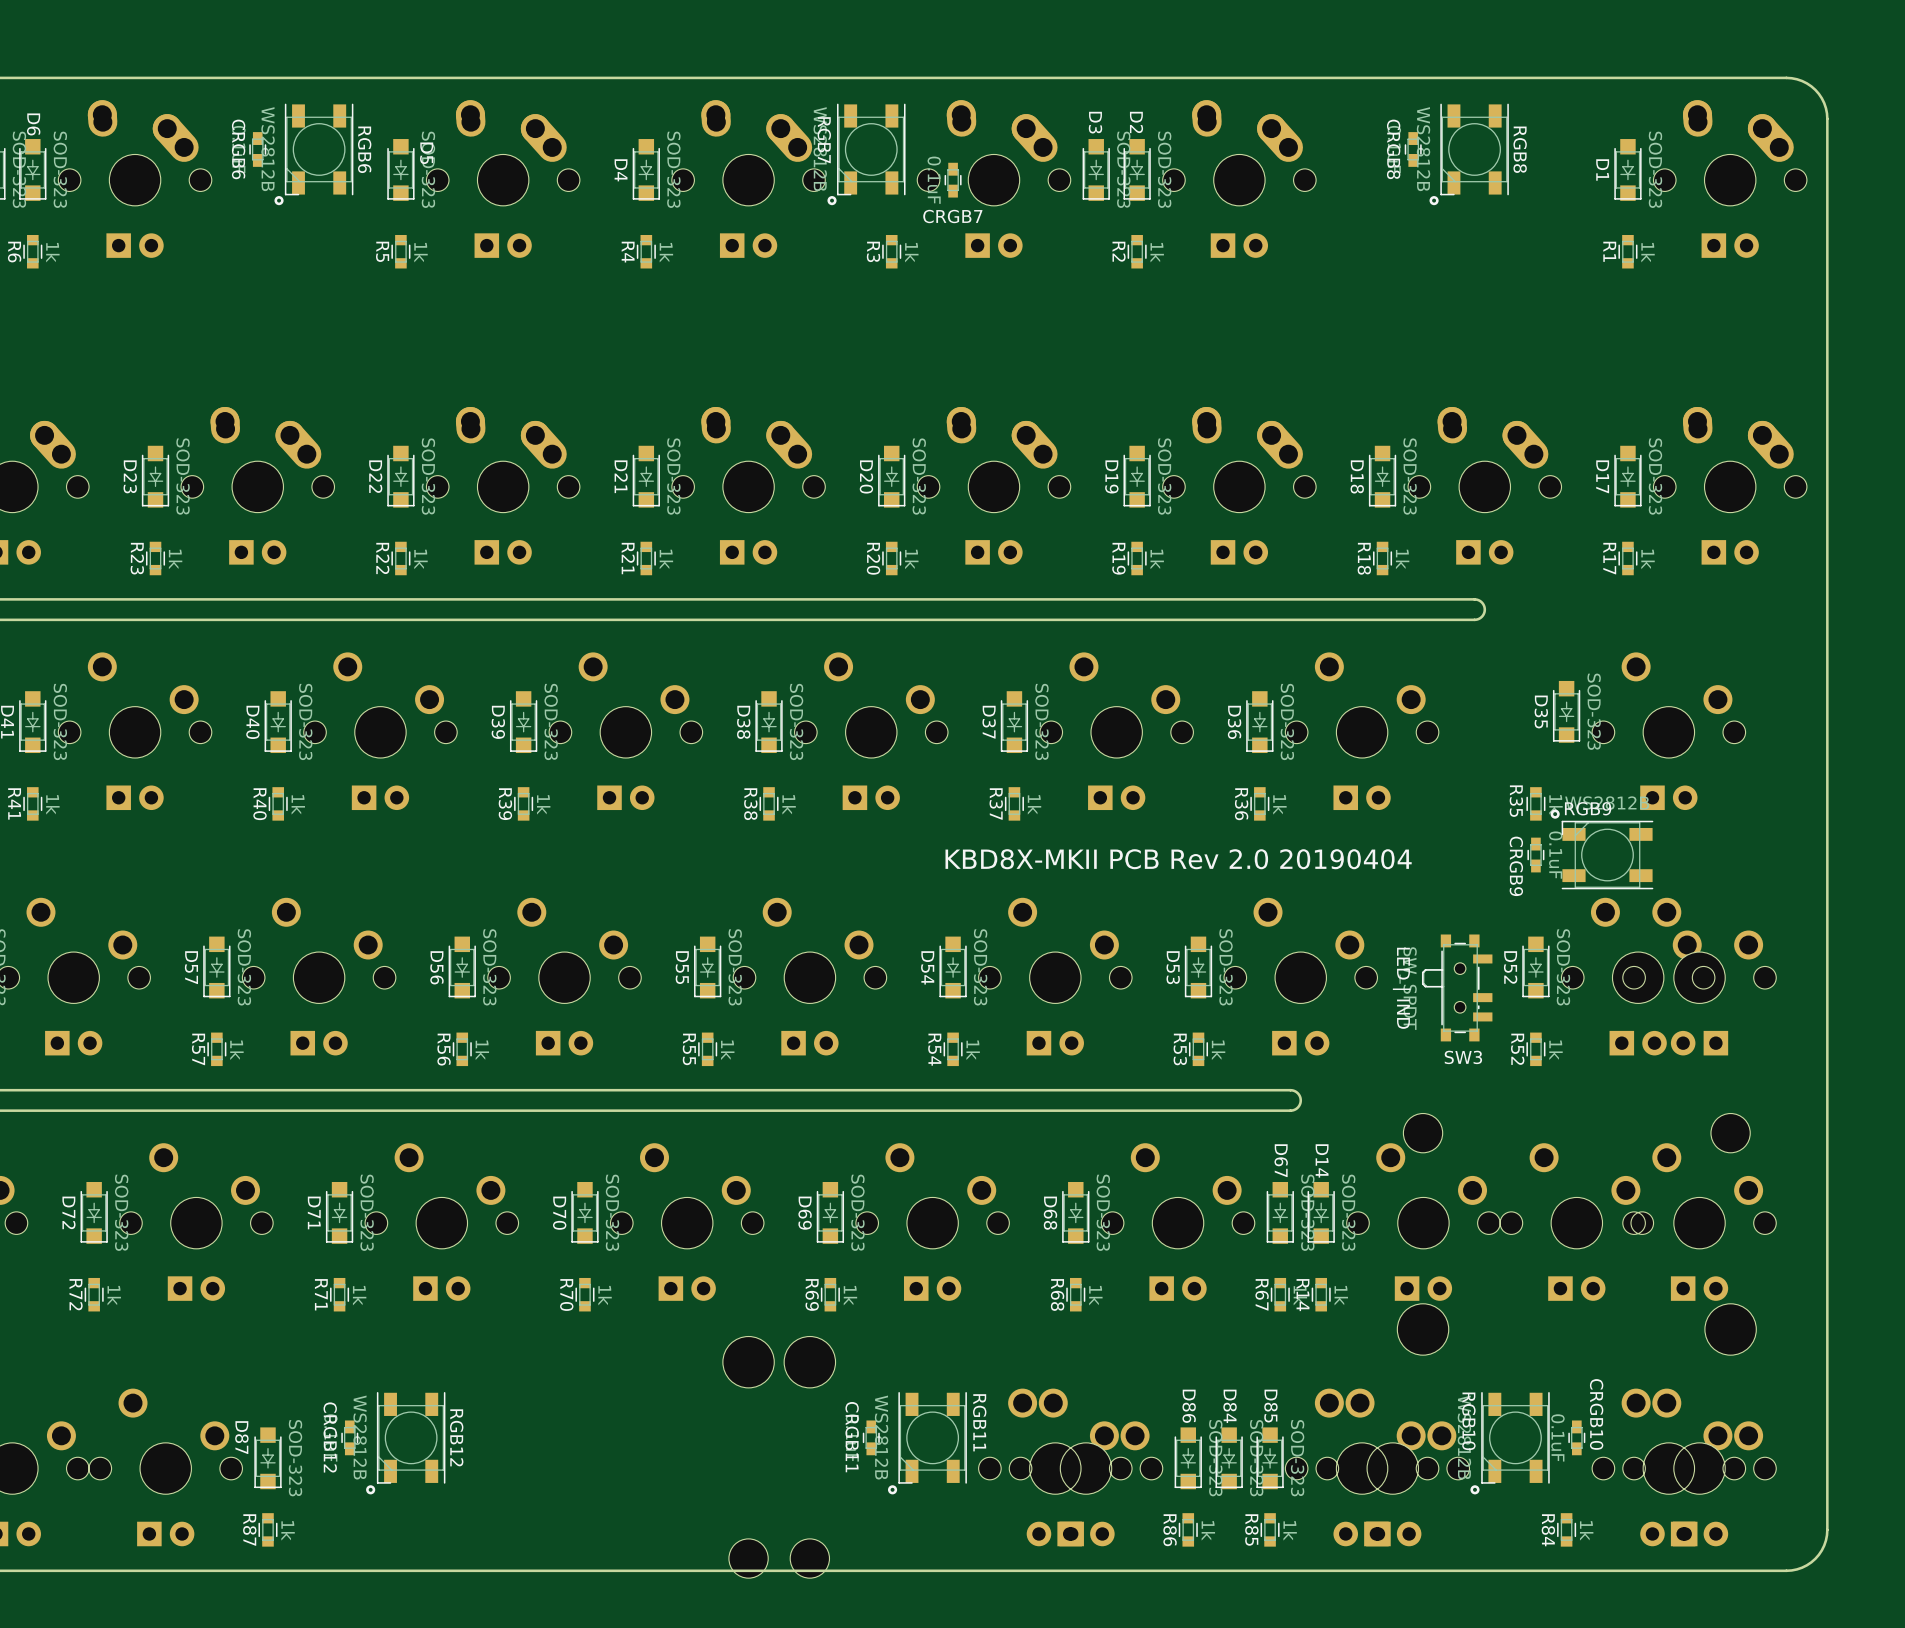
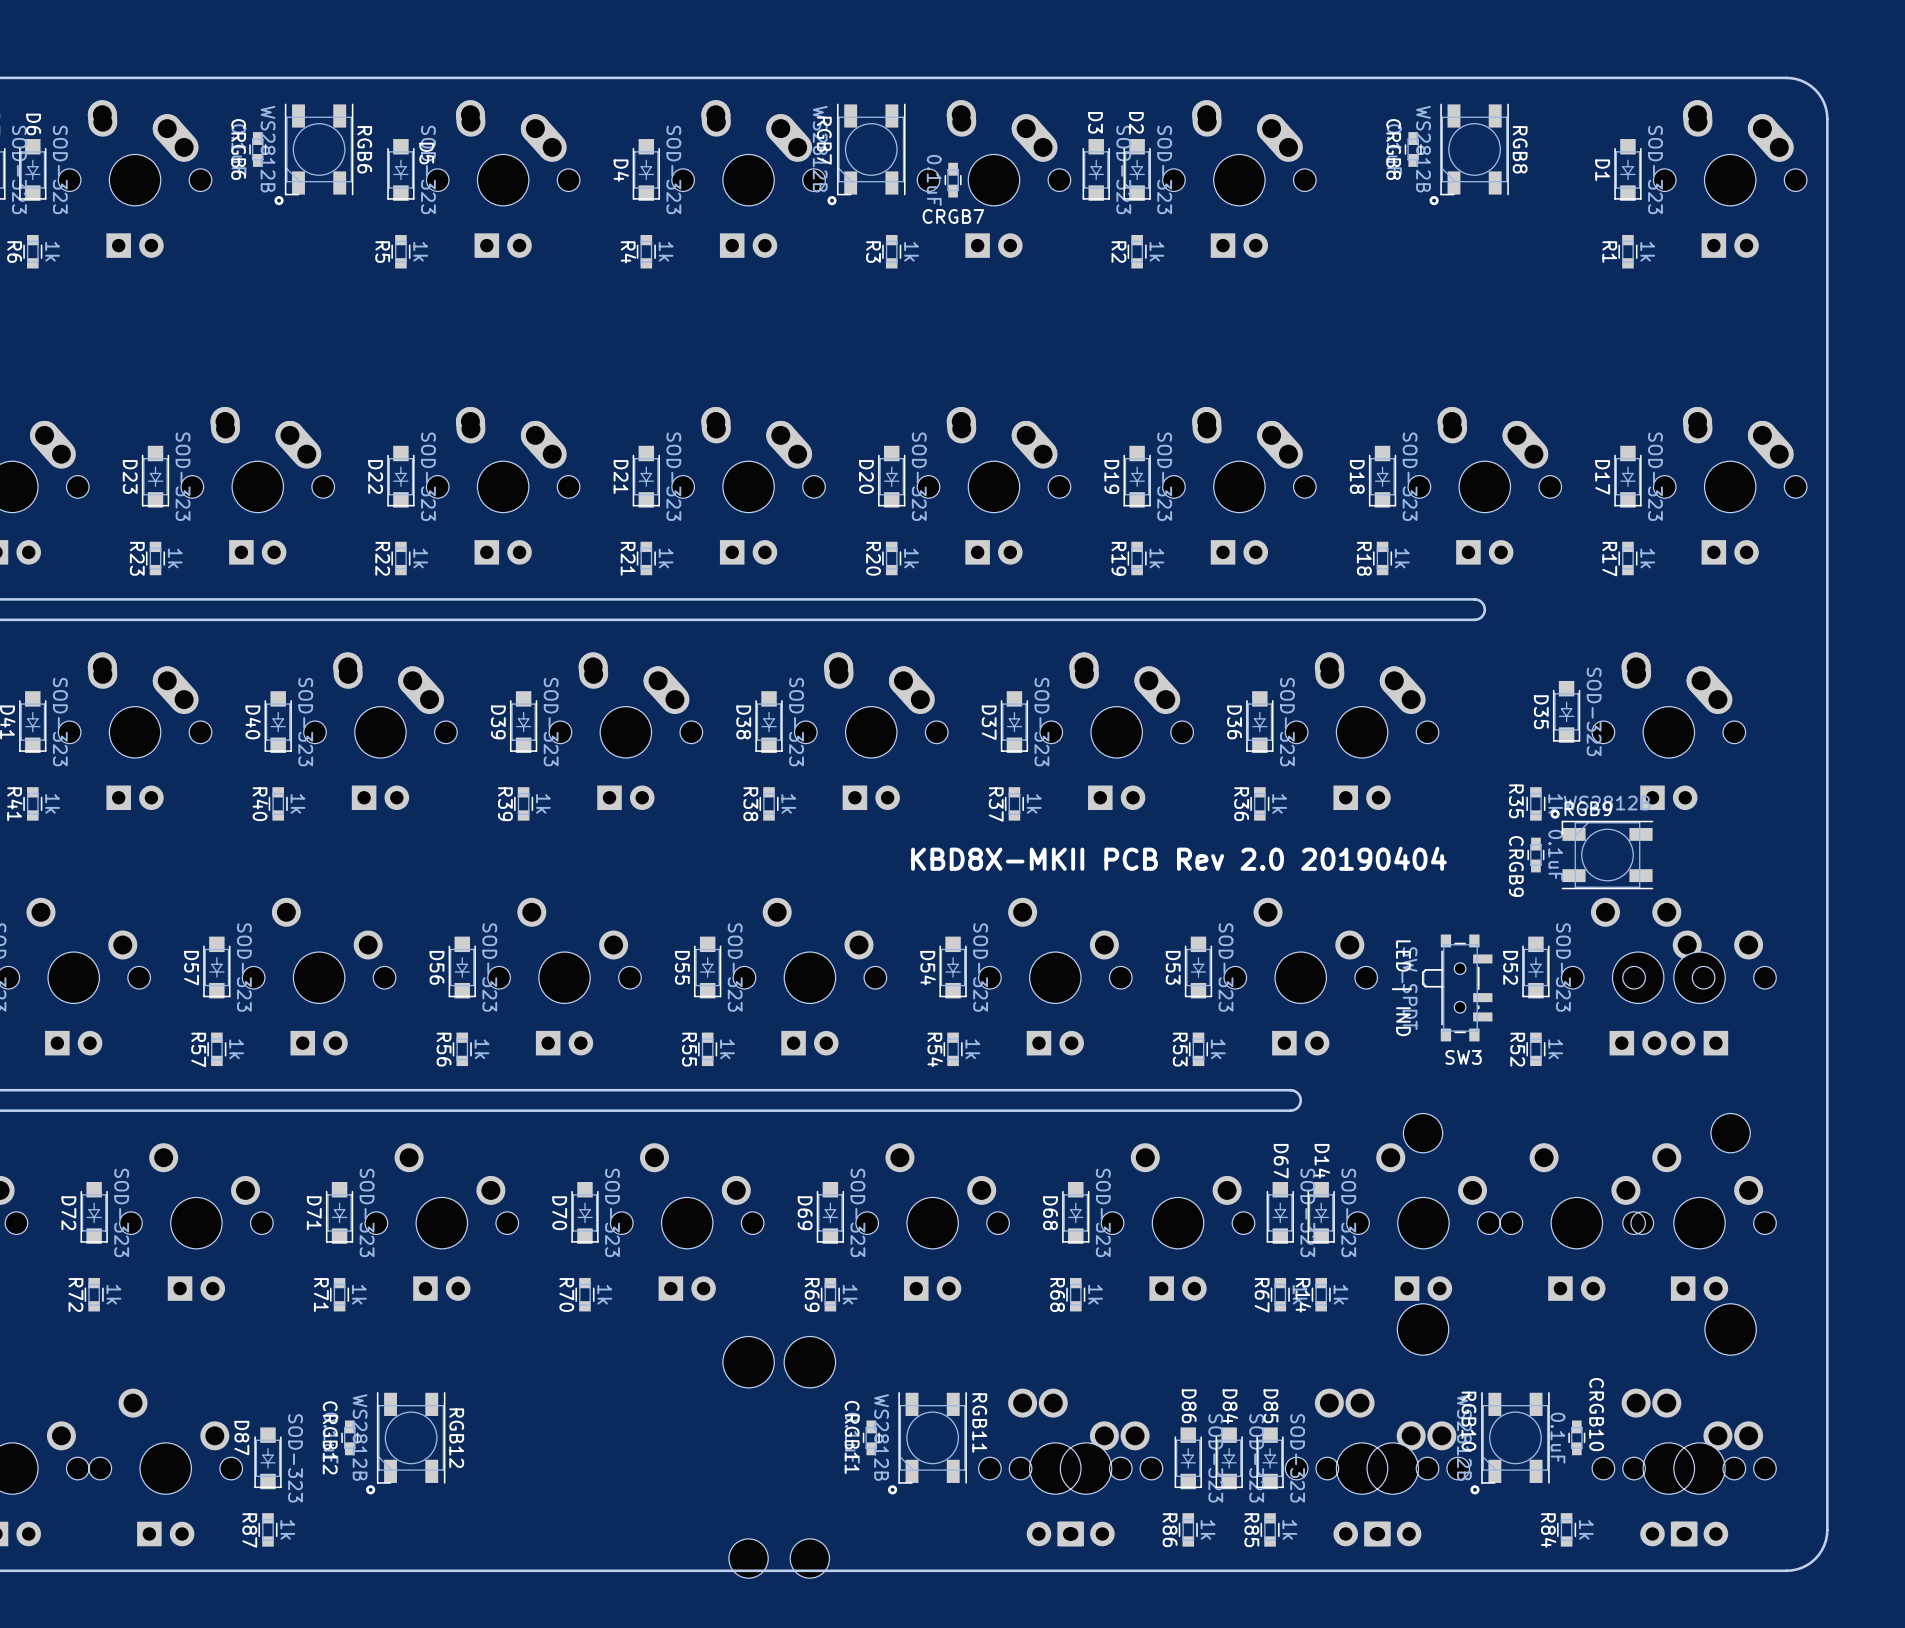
part footprint: [58, 652, 212, 811] -> [58, 652, 212, 811]
part footprint: [303, 652, 458, 811] -> [303, 652, 458, 811]
part footprint: [549, 652, 703, 811] -> [549, 652, 703, 811]
part footprint: [794, 652, 948, 811] -> [794, 652, 948, 811]
part footprint: [1039, 652, 1194, 811] -> [1039, 652, 1194, 811]
part footprint: [1285, 652, 1439, 811] -> [1285, 652, 1439, 811]
part footprint: [1592, 652, 1746, 811] -> [1592, 652, 1746, 811]

